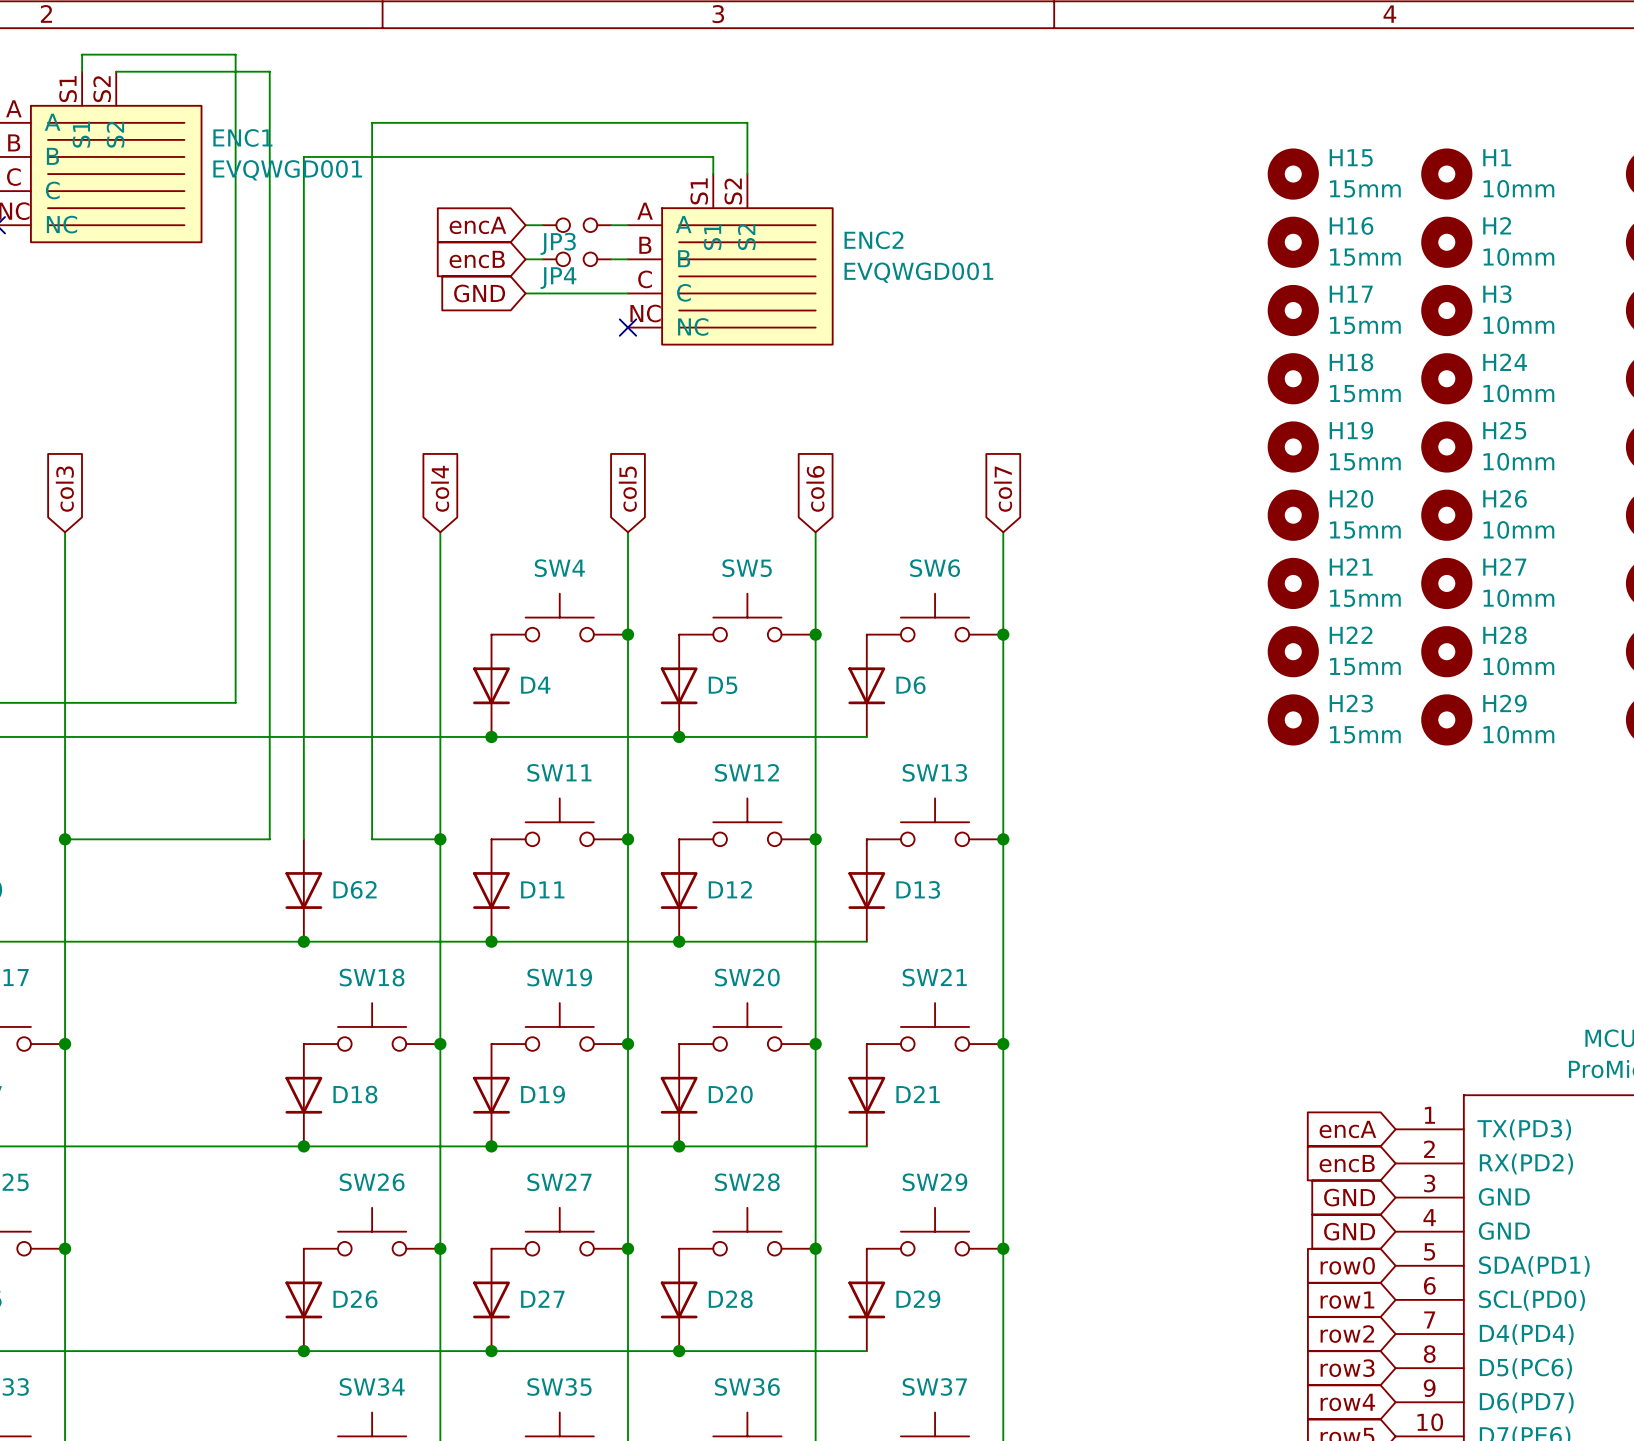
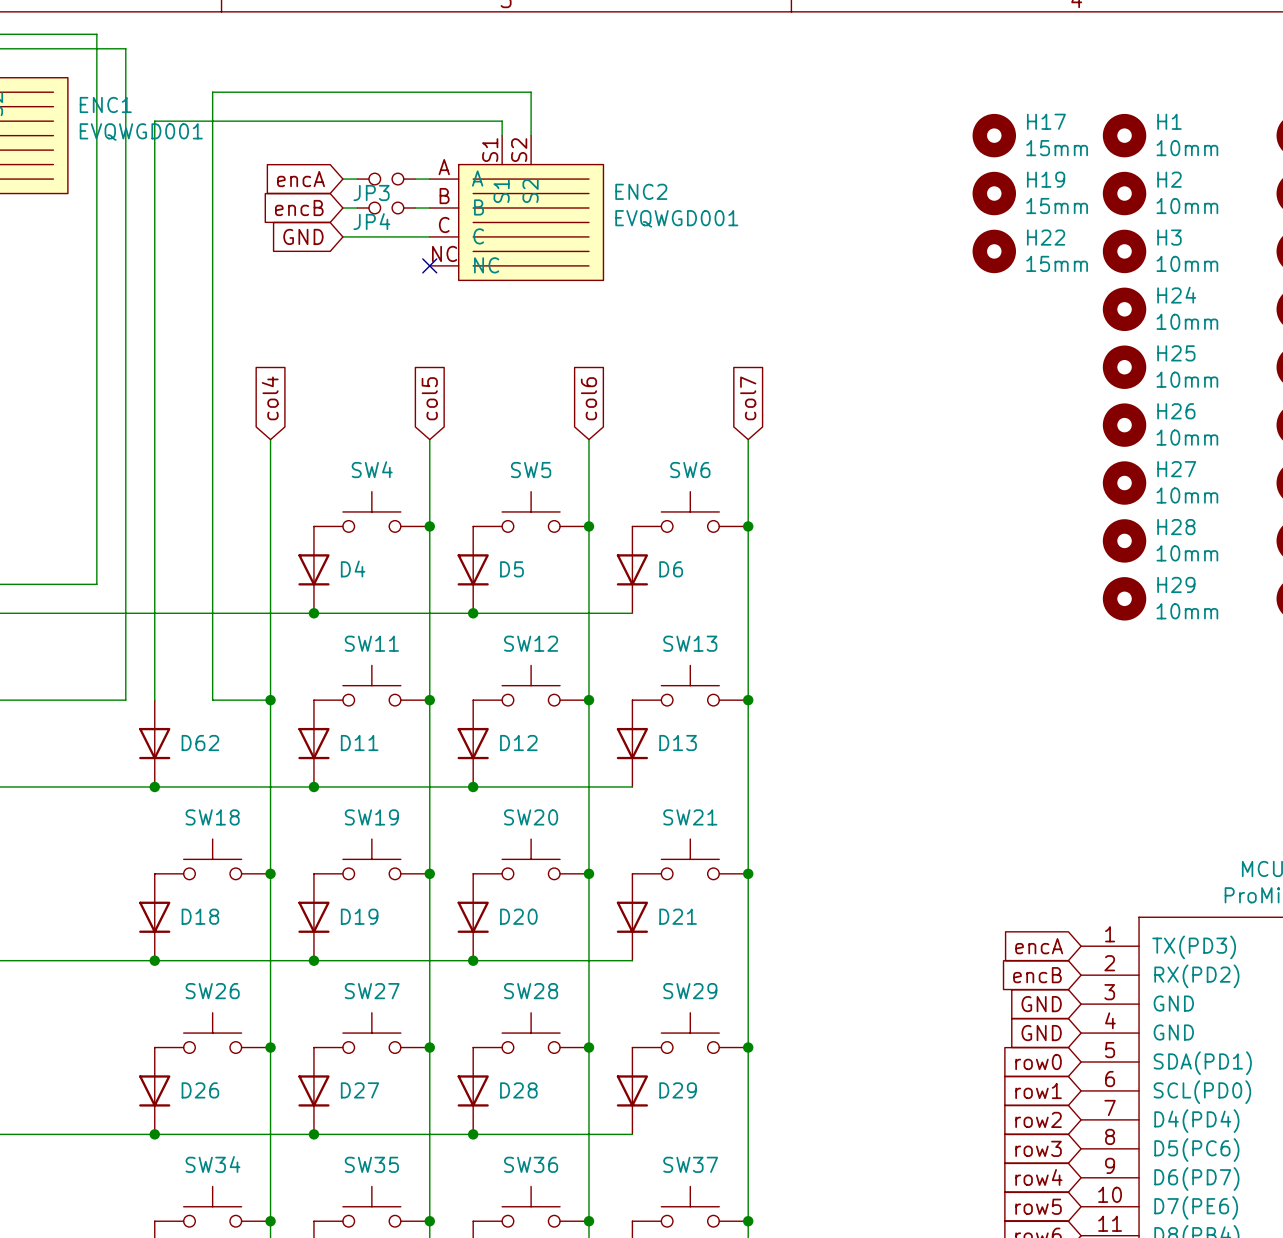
H15 name: H15 (1351, 157) -> H17 (1046, 121)
H16 name: H16 (1351, 225) -> H19 (1046, 179)
H17 name: H17 (1351, 294) -> H22 (1046, 237)
H18: 15mm (1293, 378) -> none
H19: 15mm (1293, 446) -> none
H20: 15mm (1293, 515) -> none
H21: 15mm (1293, 583) -> none
H22: 15mm (1293, 651) -> none
H23: 15mm (1293, 719) -> none

